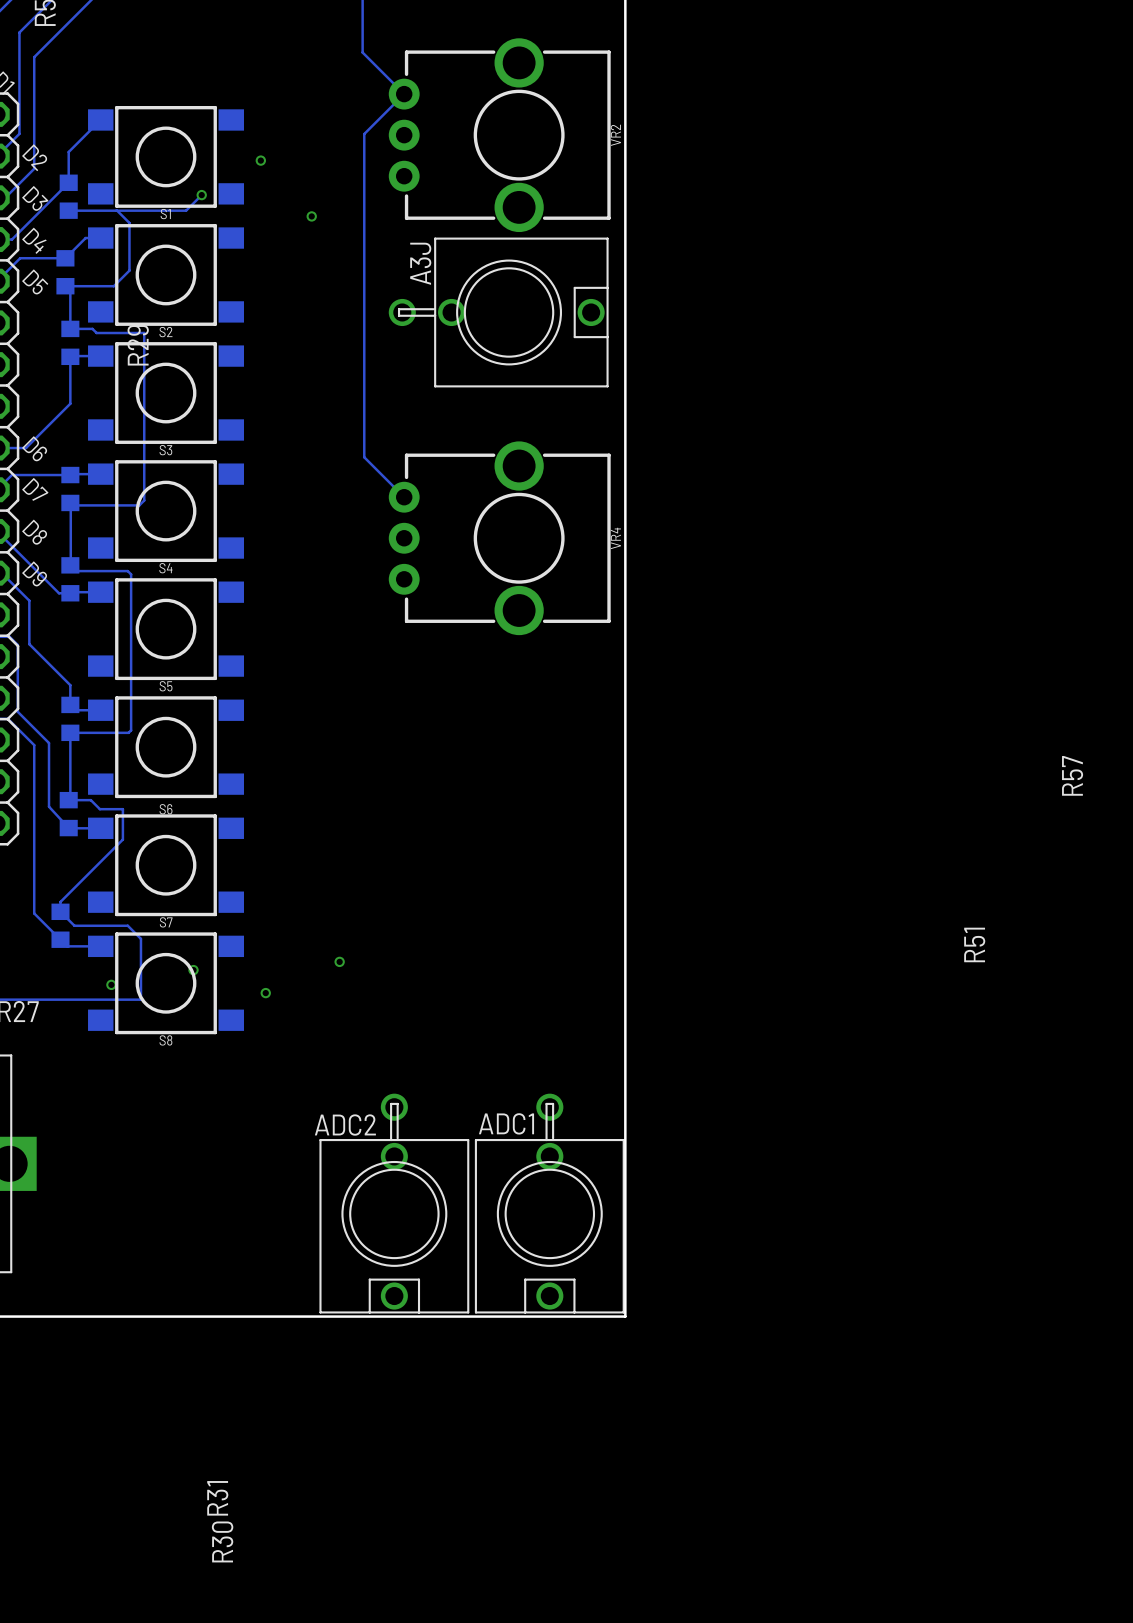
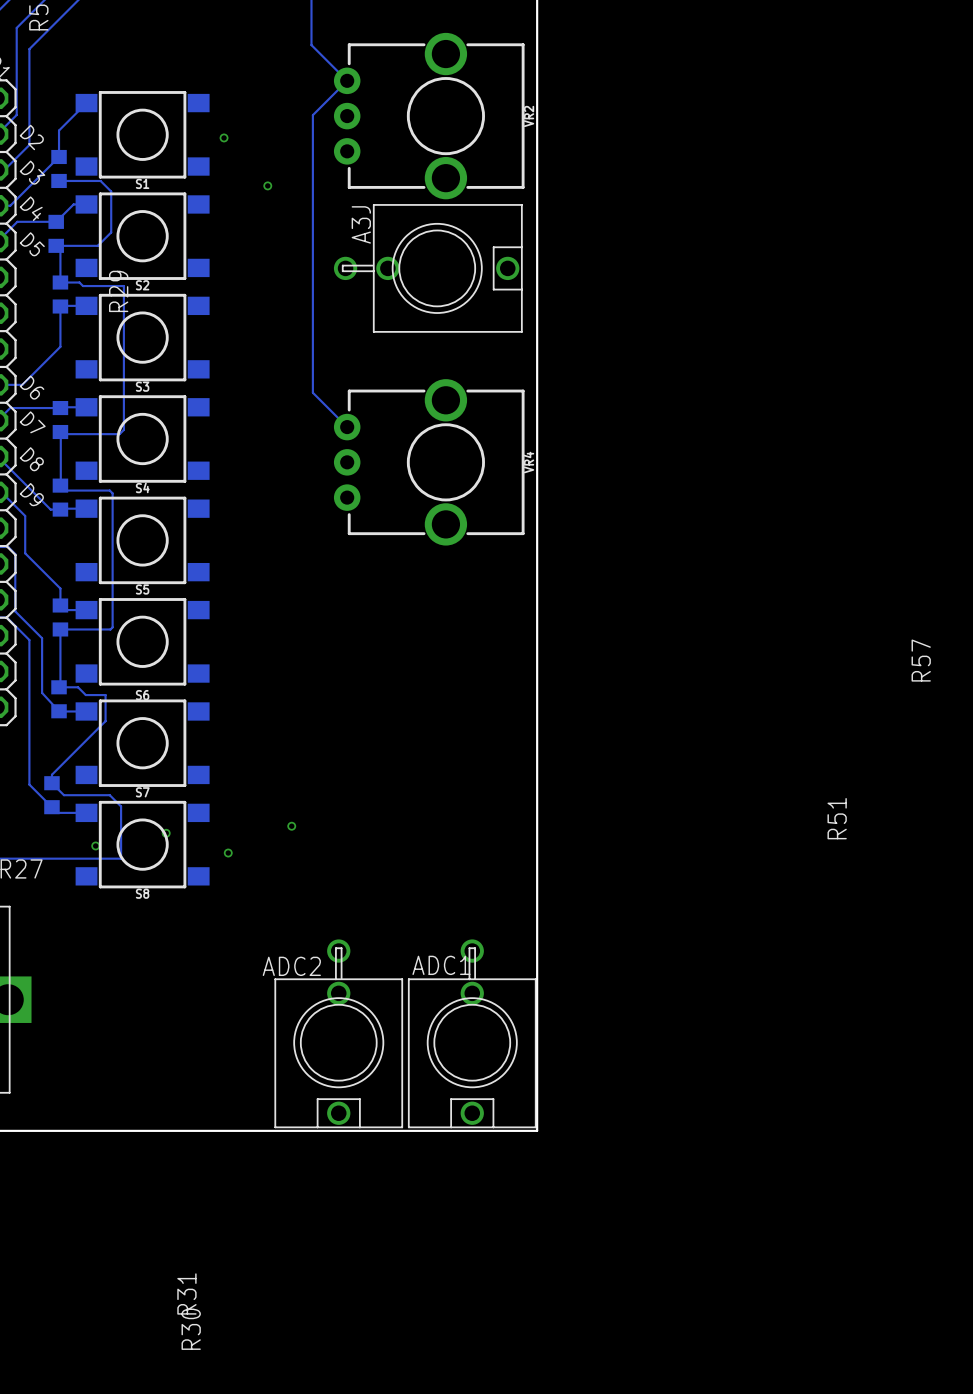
track: (201, 195) (186, 210) (116, 210) -> none
via: (201, 195) -> none

